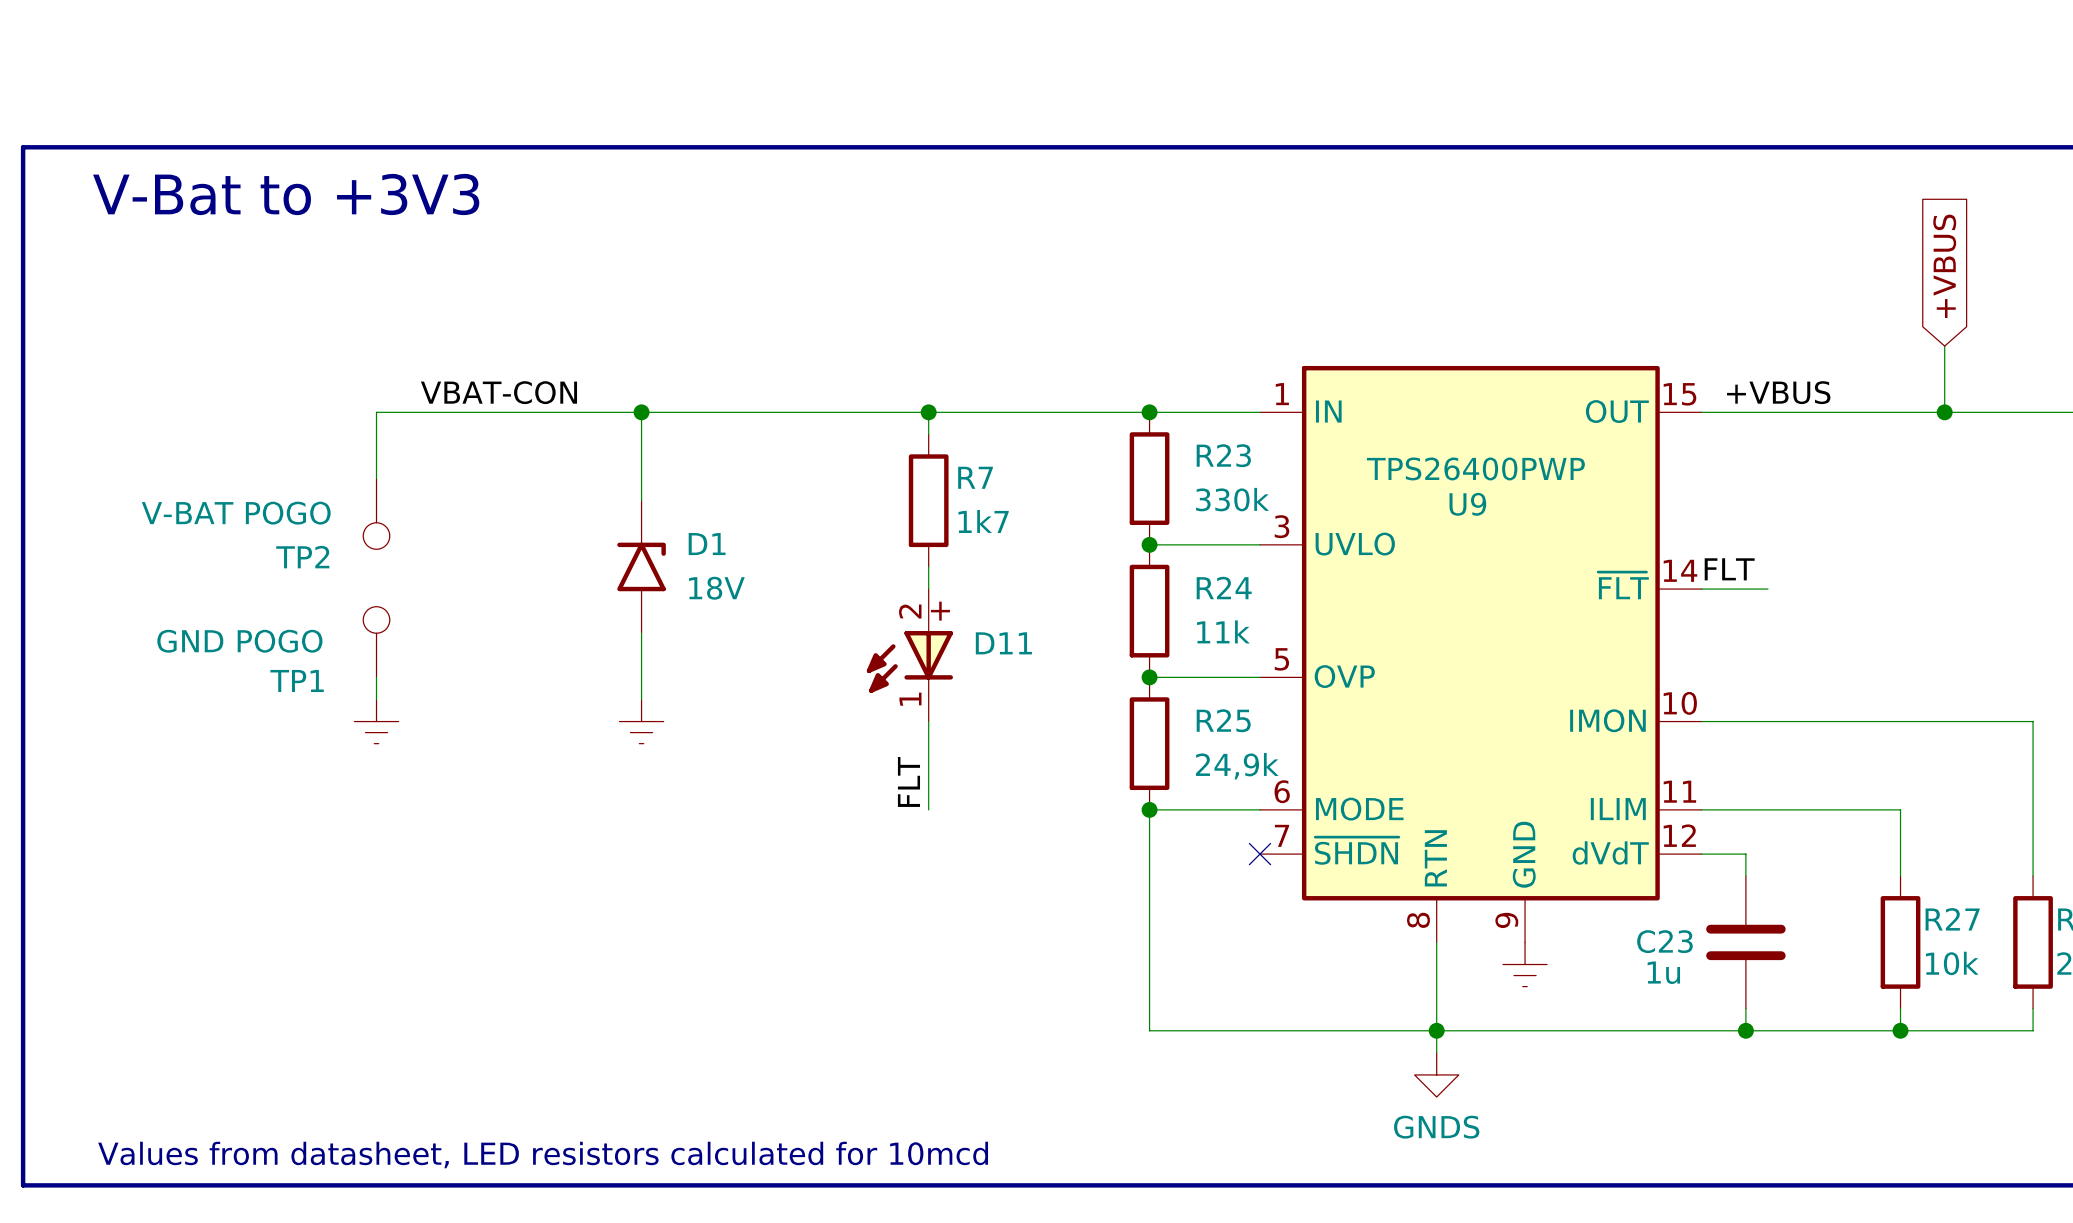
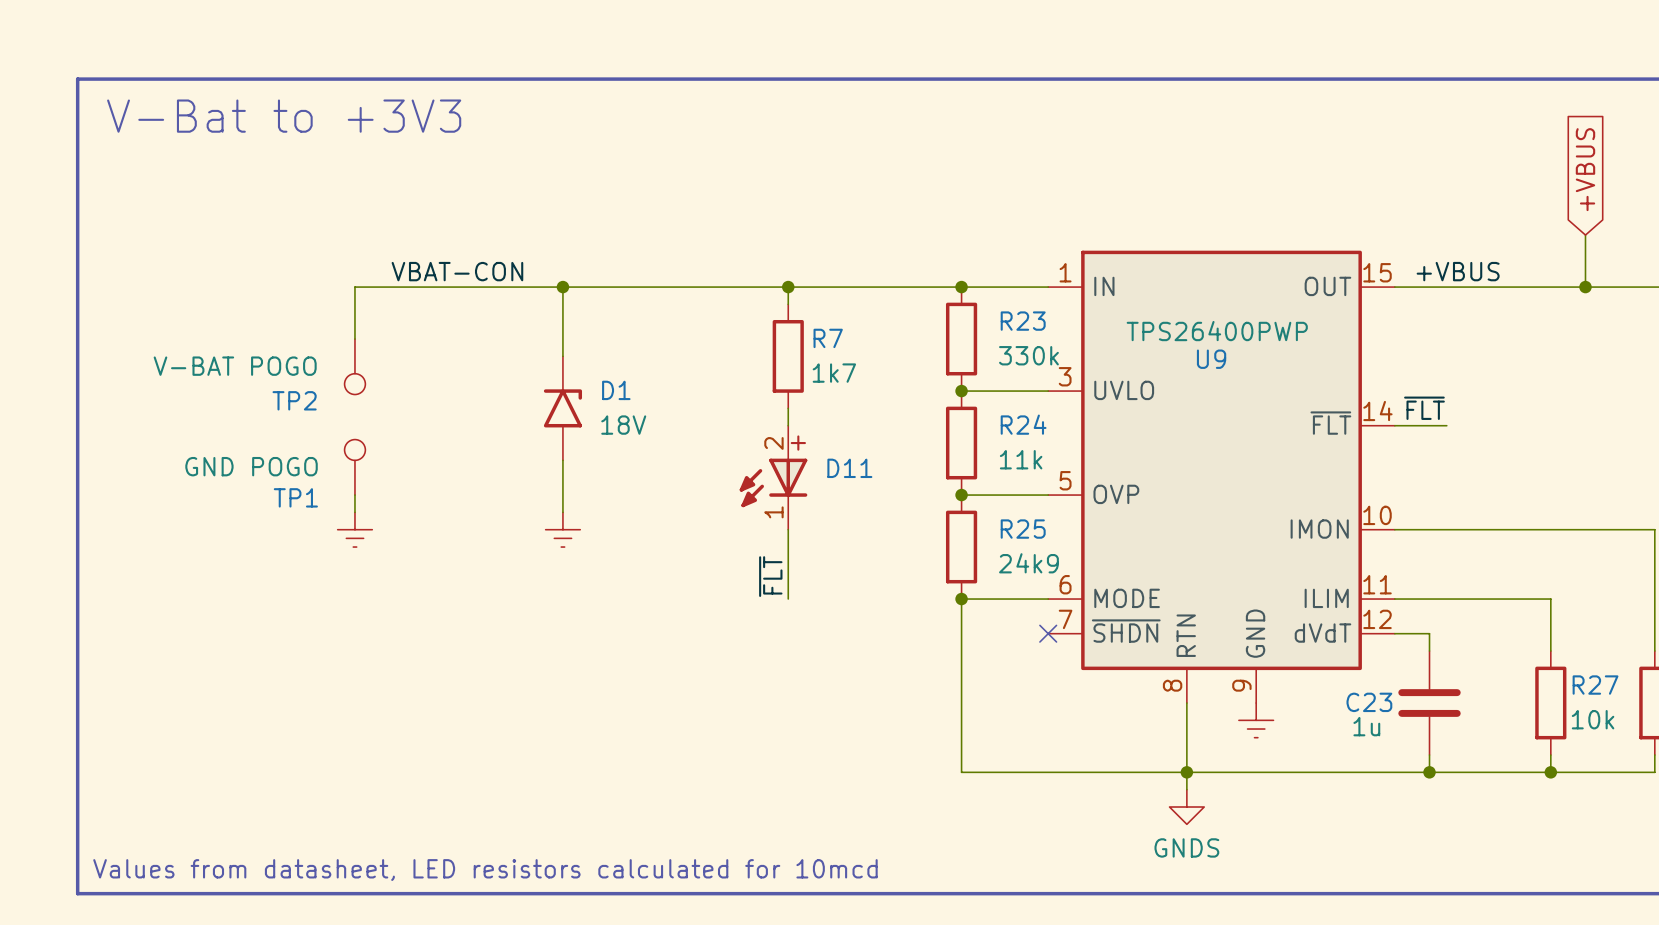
label: FLT (1729, 569) -> ~{FLT} (1424, 408)
R25 value: 24,9k (1237, 766) -> 24k9 (1028, 563)
label: FLT (908, 781) -> ~{FLT} (770, 576)

